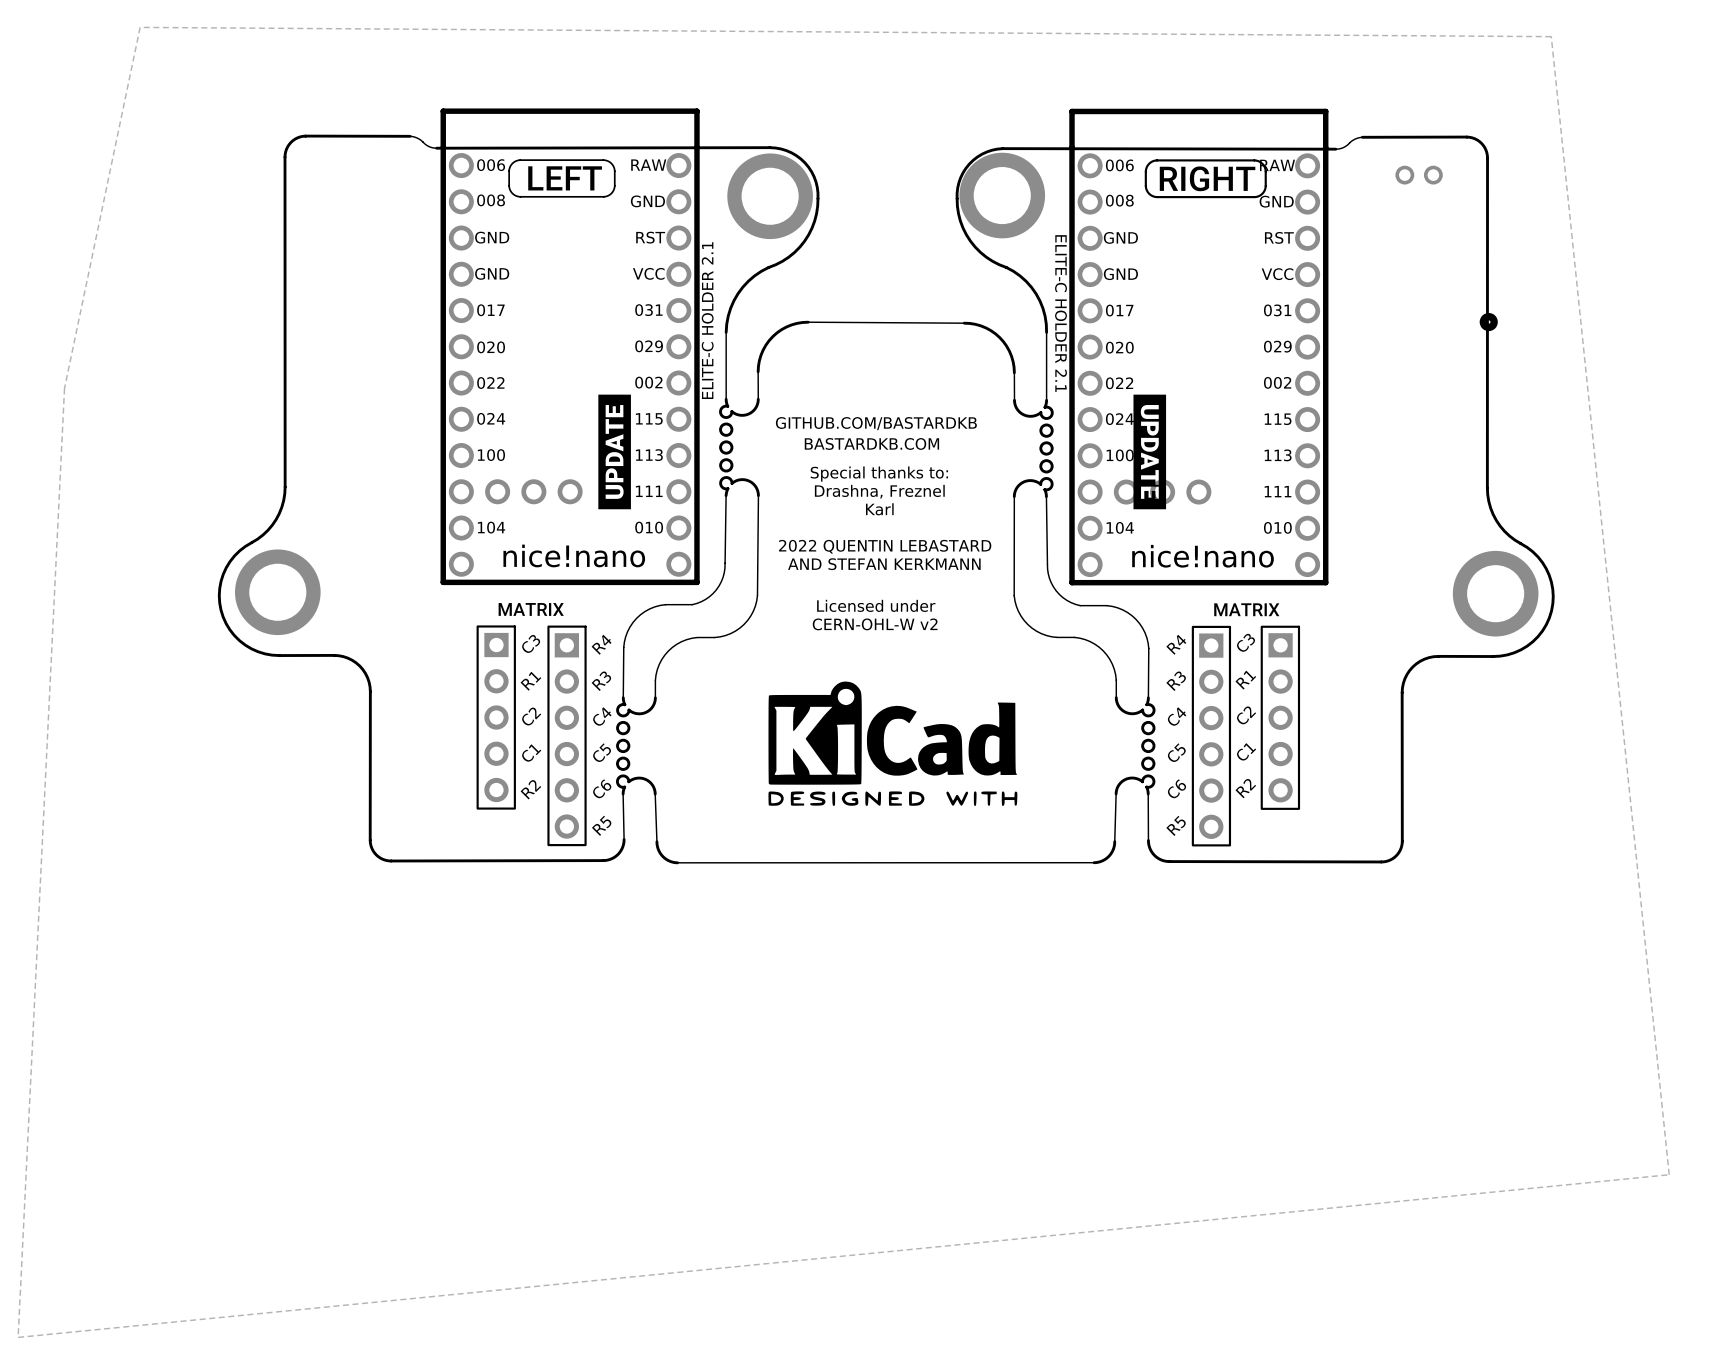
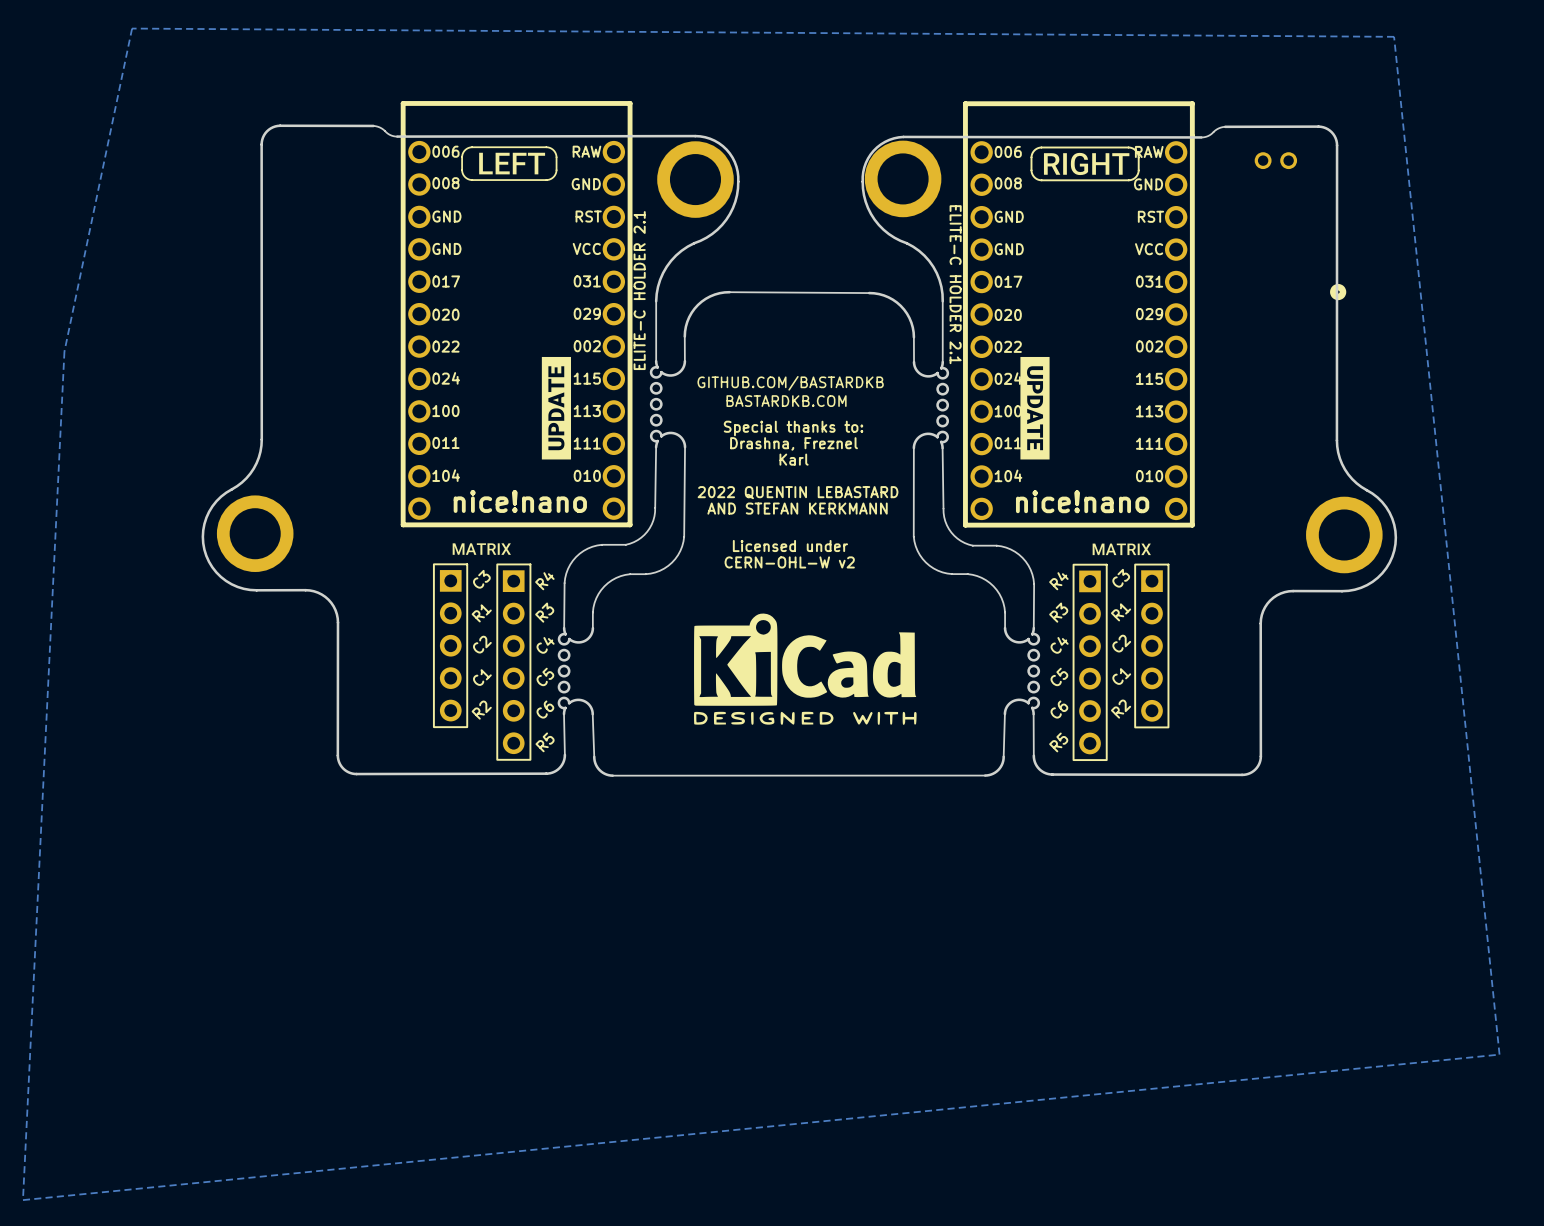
part footprint: [440, 108, 700, 586] -> [400, 101, 633, 528]
part footprint: [1069, 108, 1329, 586] -> [963, 101, 1195, 528]

